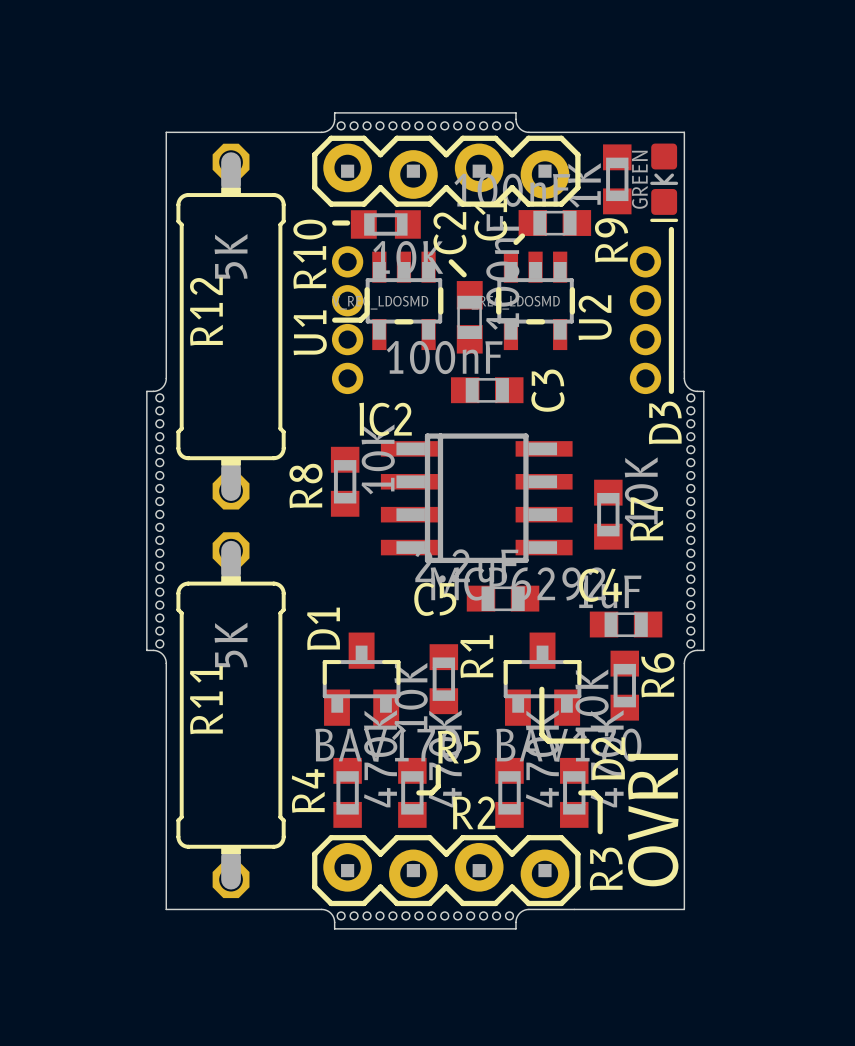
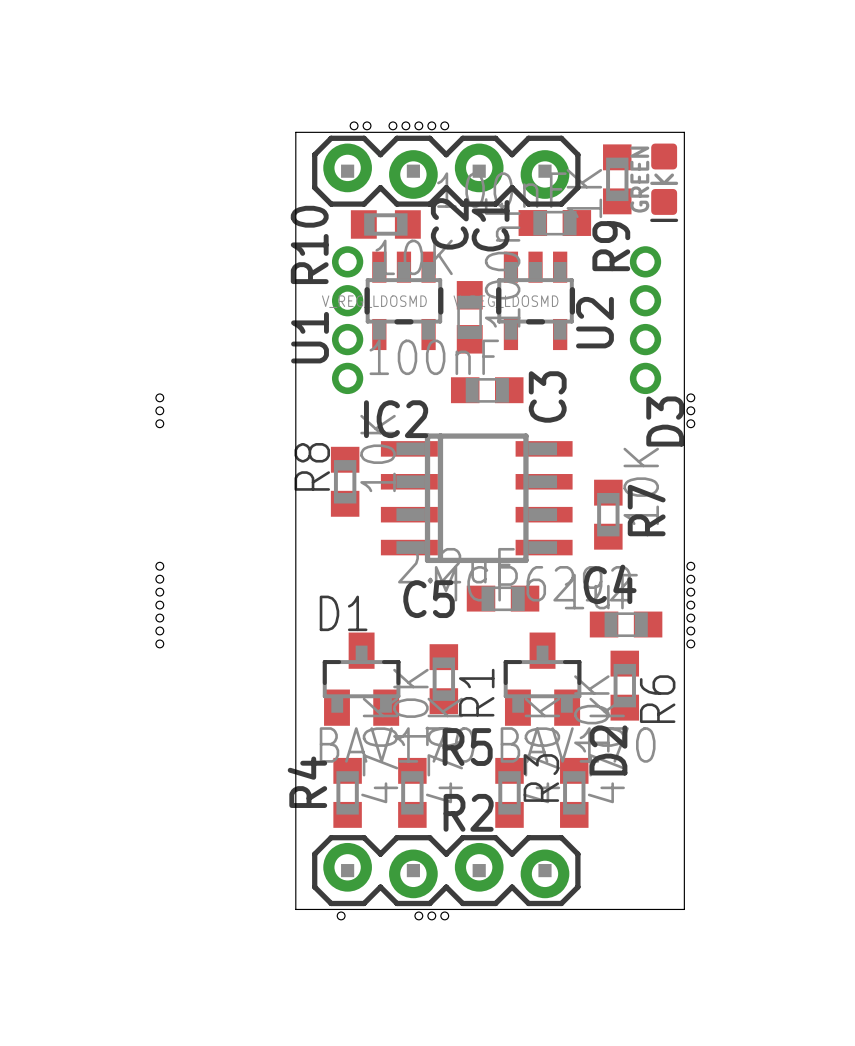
hole: (341, 125) -> none
hole: (379, 125) -> none
hole: (457, 125) -> none
hole: (470, 125) -> none
hole: (483, 125) -> none
hole: (496, 125) -> none
hole: (509, 125) -> none
board edge: (295, 132) (166, 132) (166, 380) (159, 389) (146, 391) (146, 650) (159, 652) (166, 661) (166, 909) (295, 909) -> (295, 132) (295, 909)
board edge: (321, 132) (328, 130) (332, 125) (334, 112) (515, 112) (517, 125) (522, 130) (528, 132) -> (321, 132) (528, 132)
line: (334, 223) (347, 223) -> none
line: (671, 229) (671, 391) -> none
line: (522, 235) (515, 242) -> none
line: (451, 261) (464, 274) -> none
line: (367, 313) (360, 320) (334, 320) -> none
R12: 5K (231, 326) -> none
board edge: (684, 378) (686, 384) (690, 389) (703, 391) (703, 650) (690, 652) (686, 656) (684, 663) -> (684, 378) (684, 663)
hole: (159, 436) -> none
hole: (690, 436) -> none
hole: (159, 449) -> none
hole: (690, 449) -> none
hole: (159, 462) -> none
hole: (690, 462) -> none
hole: (159, 475) -> none
hole: (690, 475) -> none
R8 name position: R8 (305, 485) -> R8 (312, 466)
hole: (159, 488) -> none
hole: (690, 488) -> none
hole: (159, 501) -> none
hole: (690, 501) -> none
hole: (159, 514) -> none
hole: (690, 514) -> none
hole: (159, 527) -> none
hole: (690, 527) -> none
hole: (159, 540) -> none
hole: (690, 540) -> none
hole: (159, 553) -> none
hole: (690, 553) -> none
D1 name rotation: 0° (323, 628) -> 90° clockwise (343, 613)
R1 name position: R1 (476, 656) -> R1 (476, 692)
R6 name position: R6 (657, 675) -> R6 (657, 699)
line: (541, 689) (541, 734) (548, 741) (587, 741) -> none
R11: 5K (231, 715) -> none
line: (438, 766) (438, 786) (431, 792) (418, 792) -> none
line: (580, 792) (593, 792) (600, 799) (600, 831) -> none
text: OVRI (653, 820) -> none
R3 name position: R3 (606, 869) -> R3 (541, 777)
board edge: (321, 909) (328, 911) (332, 915) (334, 928) (515, 928) (517, 915) (522, 911) (528, 909) -> (321, 909) (528, 909)
hole: (354, 915) -> none
hole: (367, 915) -> none
hole: (379, 915) -> none
hole: (392, 915) -> none
hole: (405, 915) -> none
hole: (457, 915) -> none
hole: (470, 915) -> none
hole: (483, 915) -> none
hole: (496, 915) -> none
hole: (509, 915) -> none

